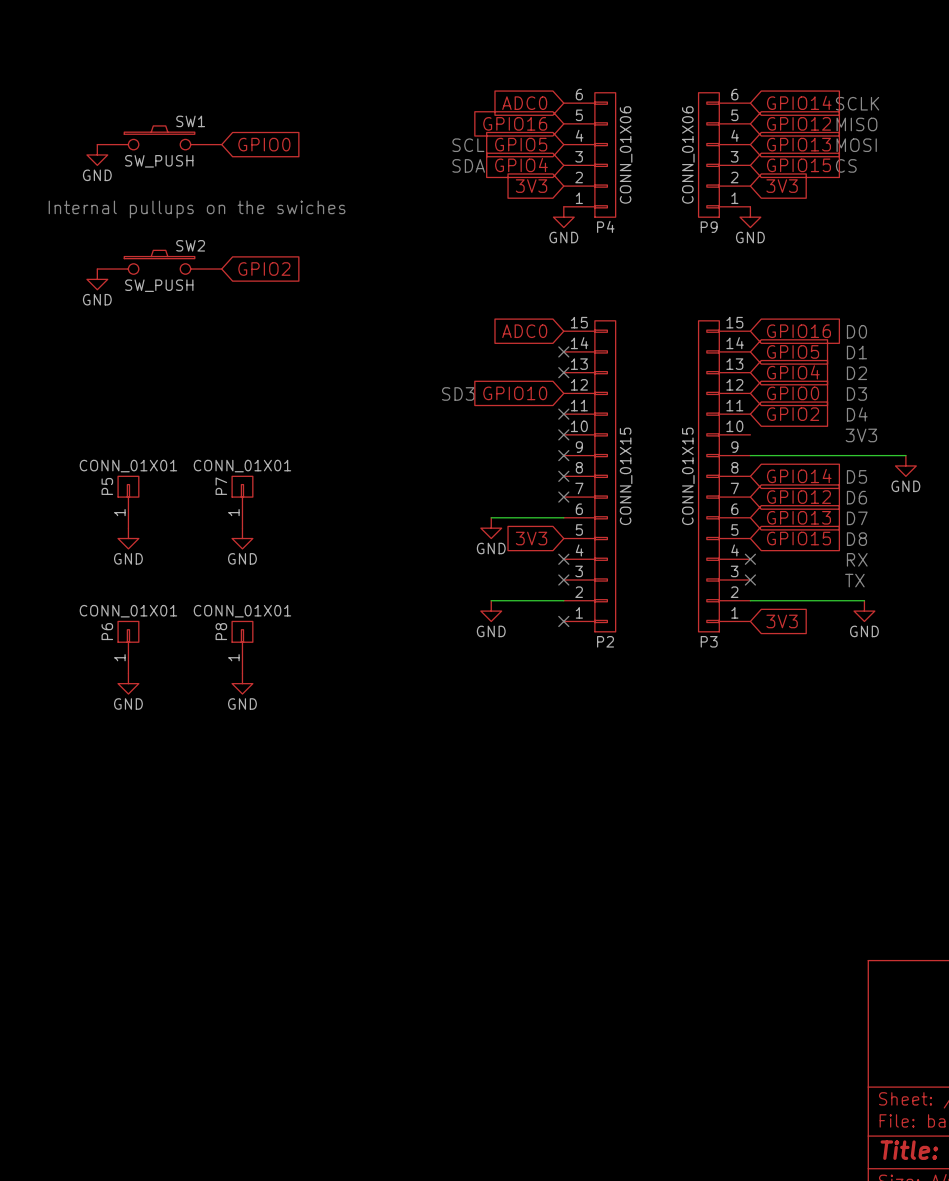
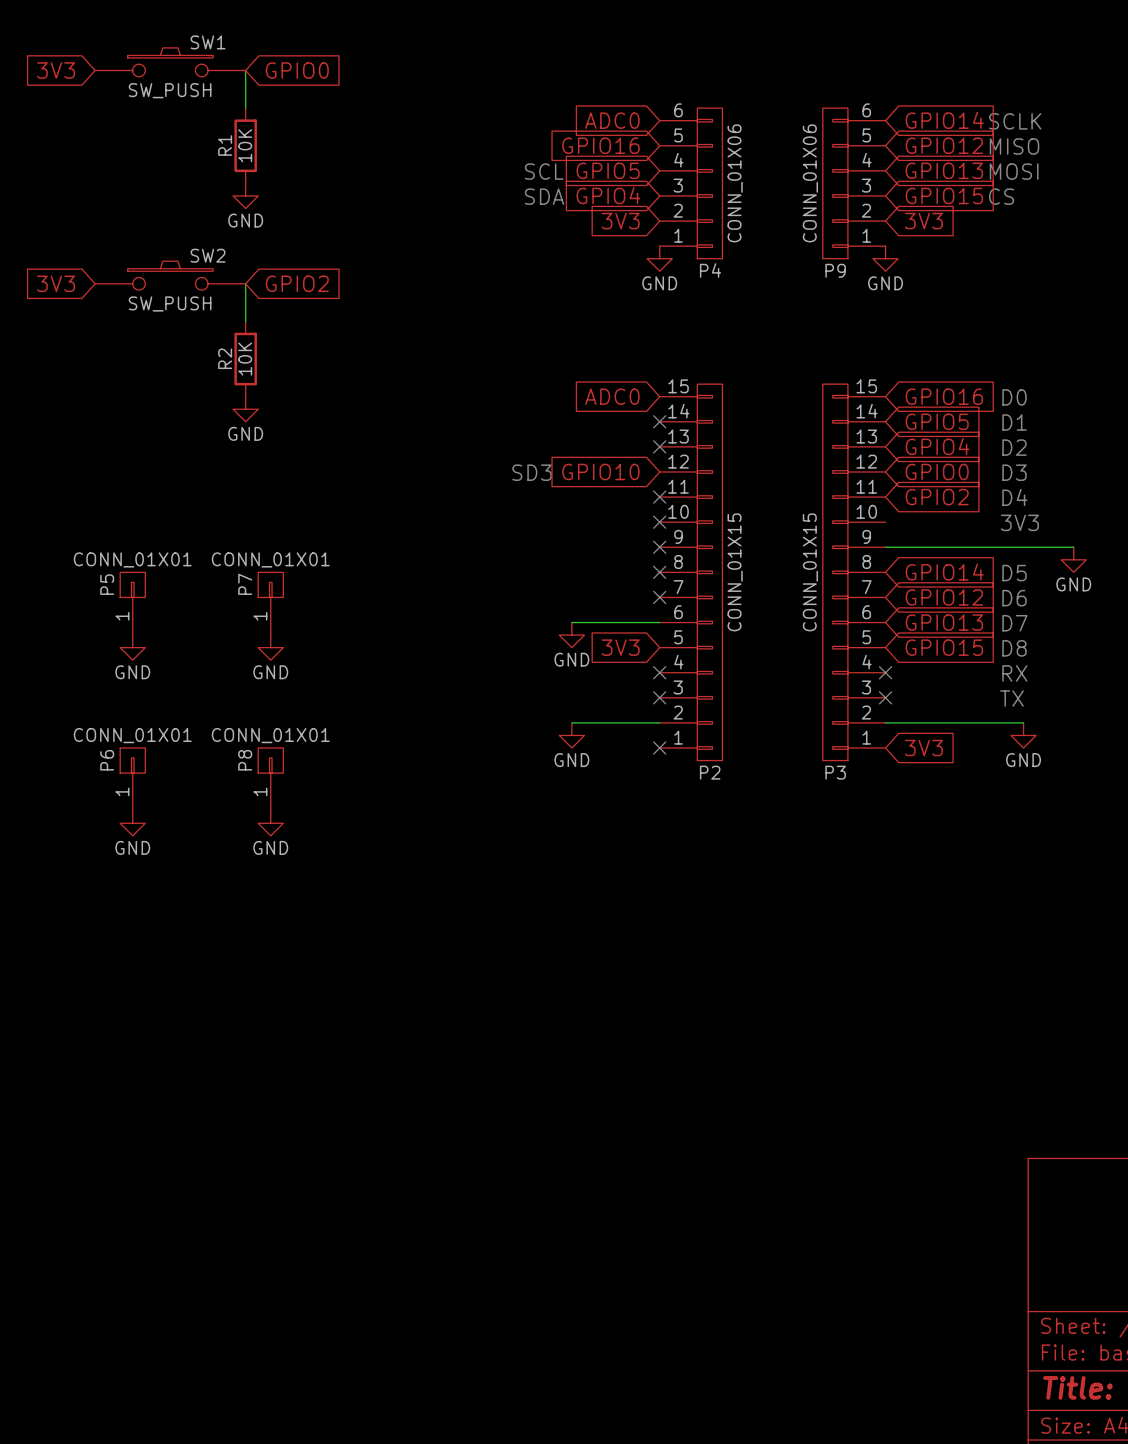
global label: none -> 3V3 (56, 70)
wire: none -> (245, 70) (245, 108)
R1: none -> 10K (245, 145)
SW1 position: (159, 137) -> (170, 62)
global label position: GPIO0 (264, 144) -> GPIO0 (297, 70)
power symbol: GND (97, 154) -> none
power symbol: none -> GND (245, 195)
text: Internal pullups on the swiches (197, 209) -> none
global label: none -> 3V3 (56, 283)
wire: none -> (245, 283) (245, 321)
SW2 position: (159, 262) -> (170, 275)
global label position: GPIO2 (264, 269) -> GPIO2 (297, 283)
power symbol: GND (97, 279) -> none
R2: none -> 10K (245, 359)
power symbol: none -> GND (245, 409)

